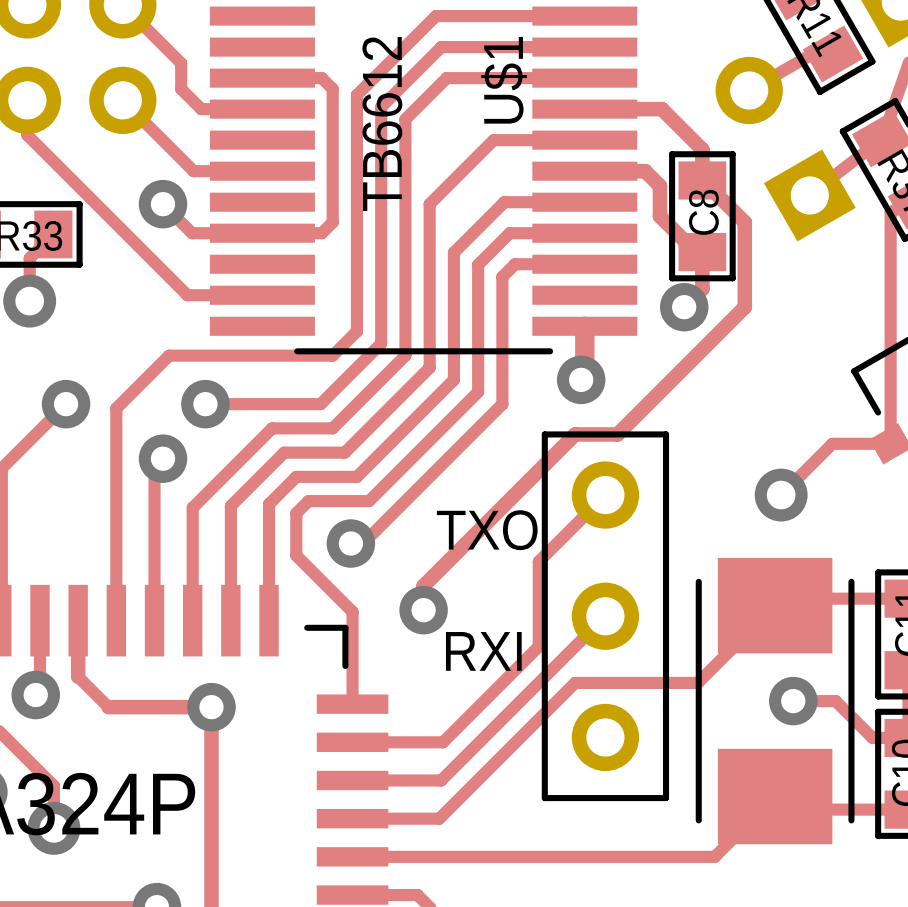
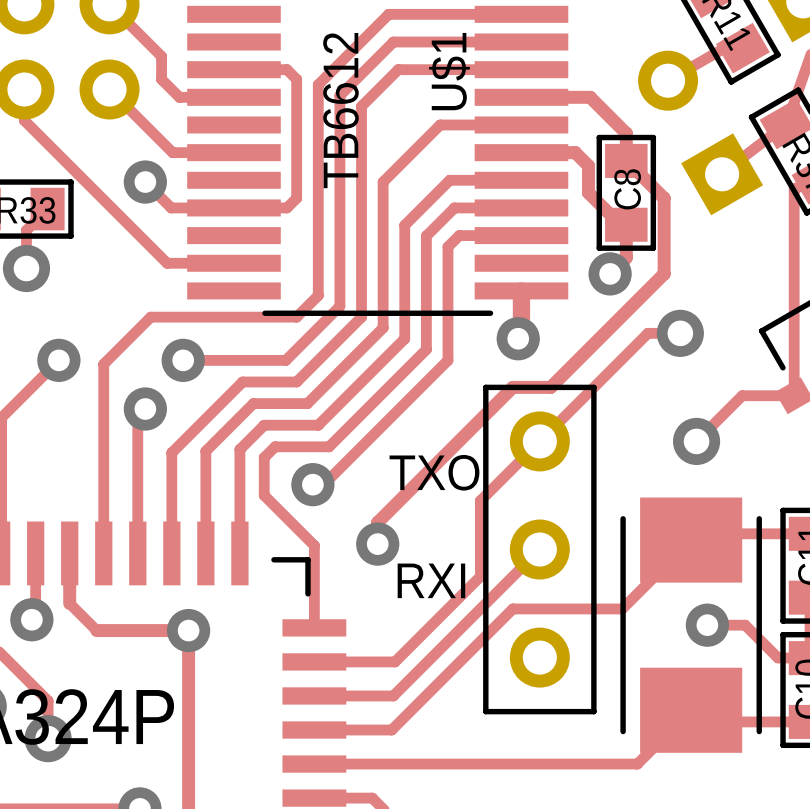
track: none -> (680, 333) (647, 333) (539, 441)
via: none -> (680, 333)

